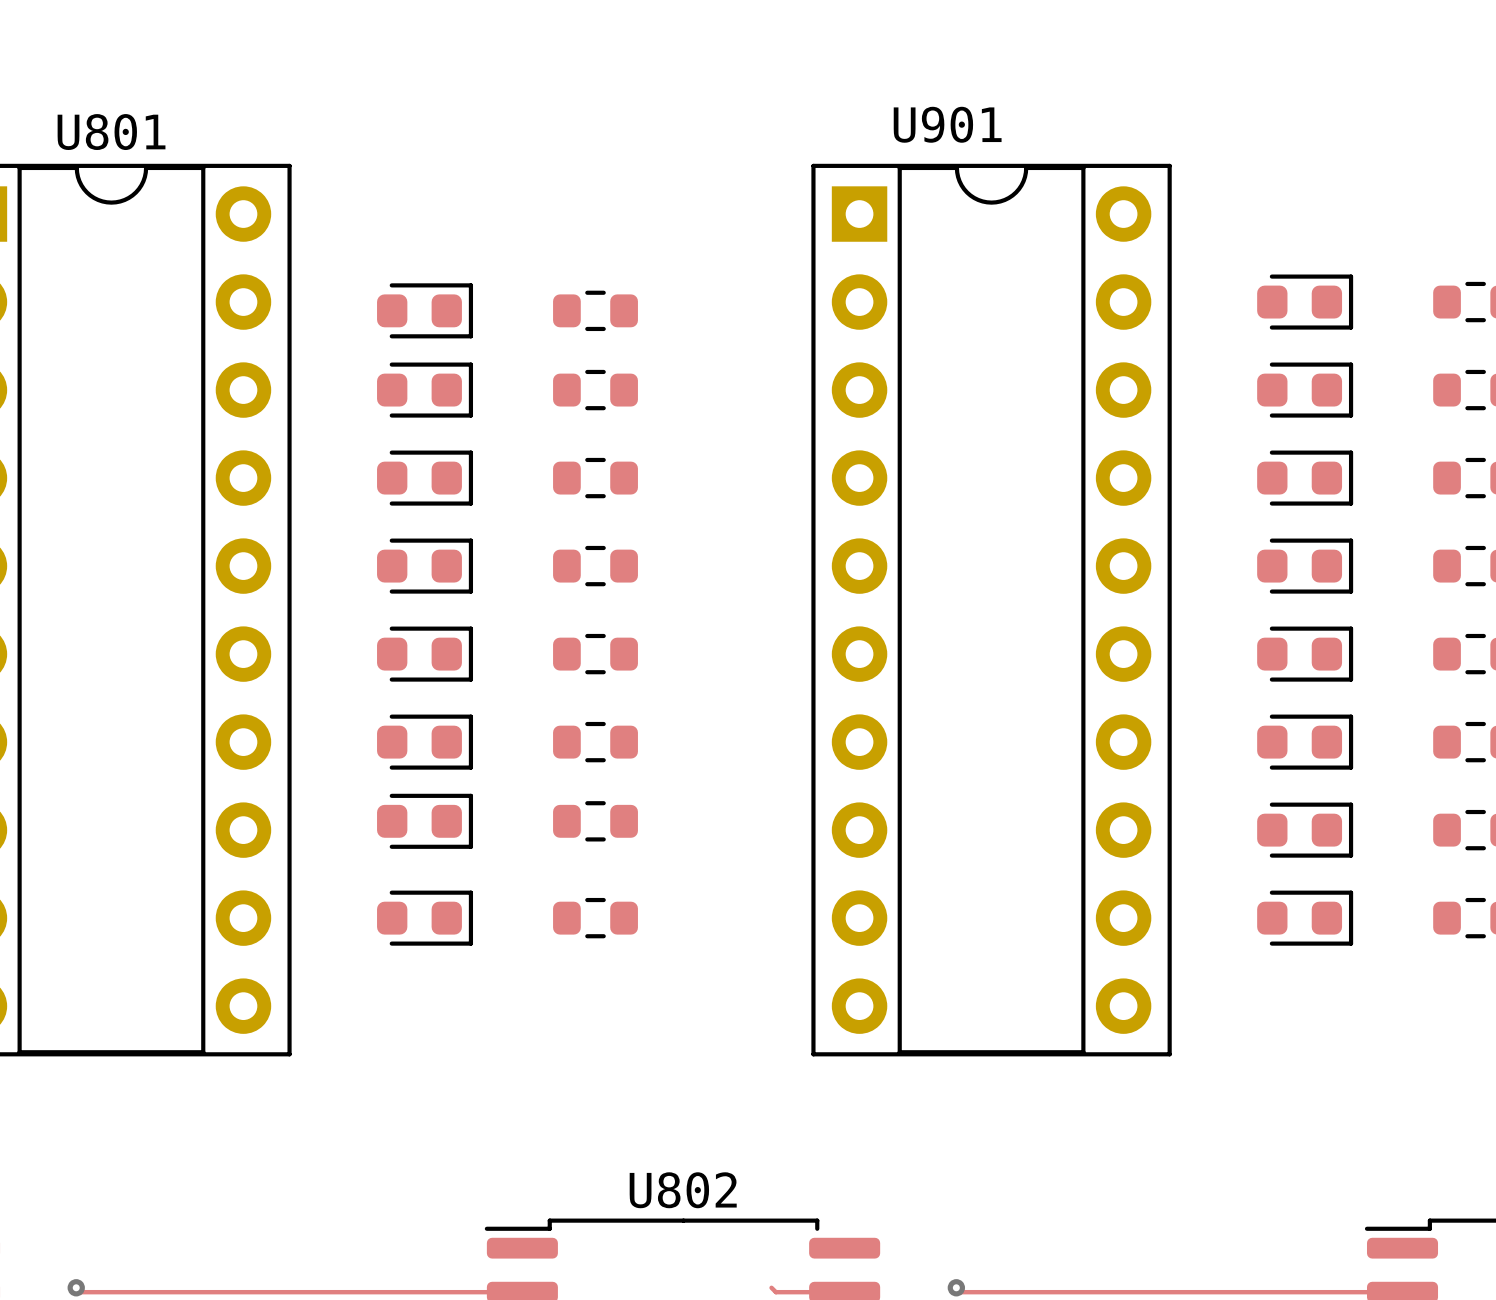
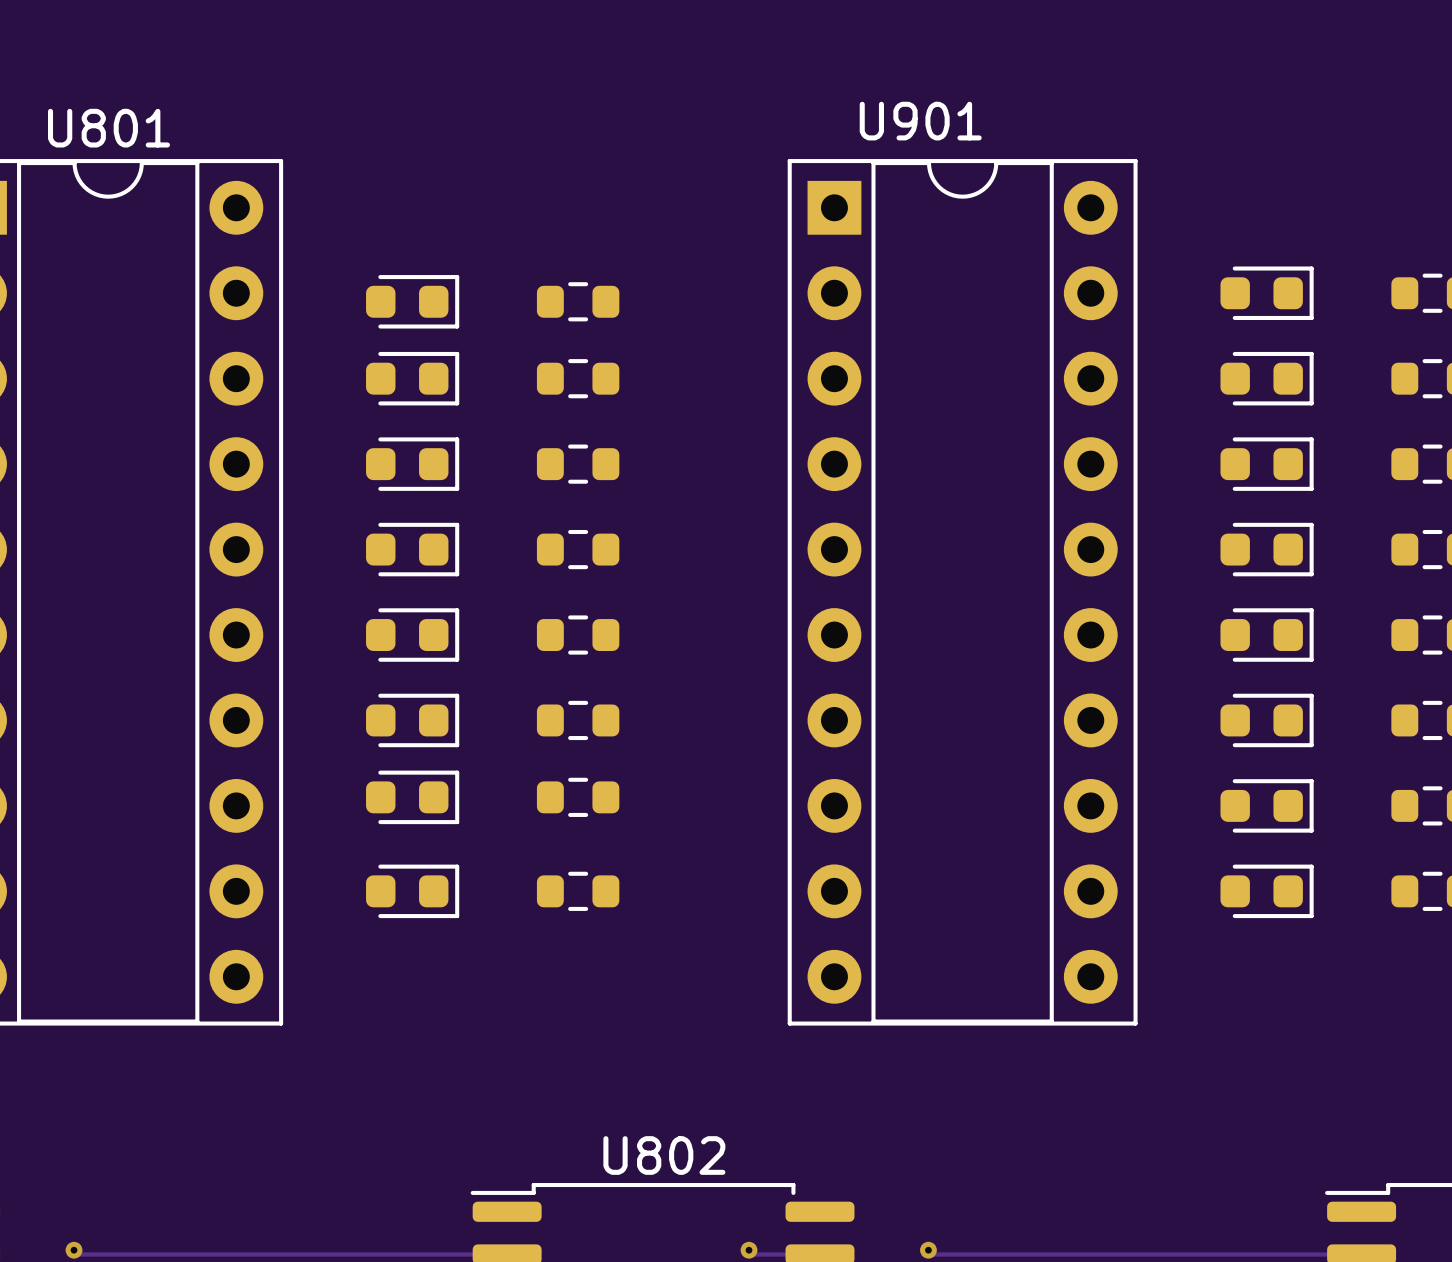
via: none -> (749, 1250)

